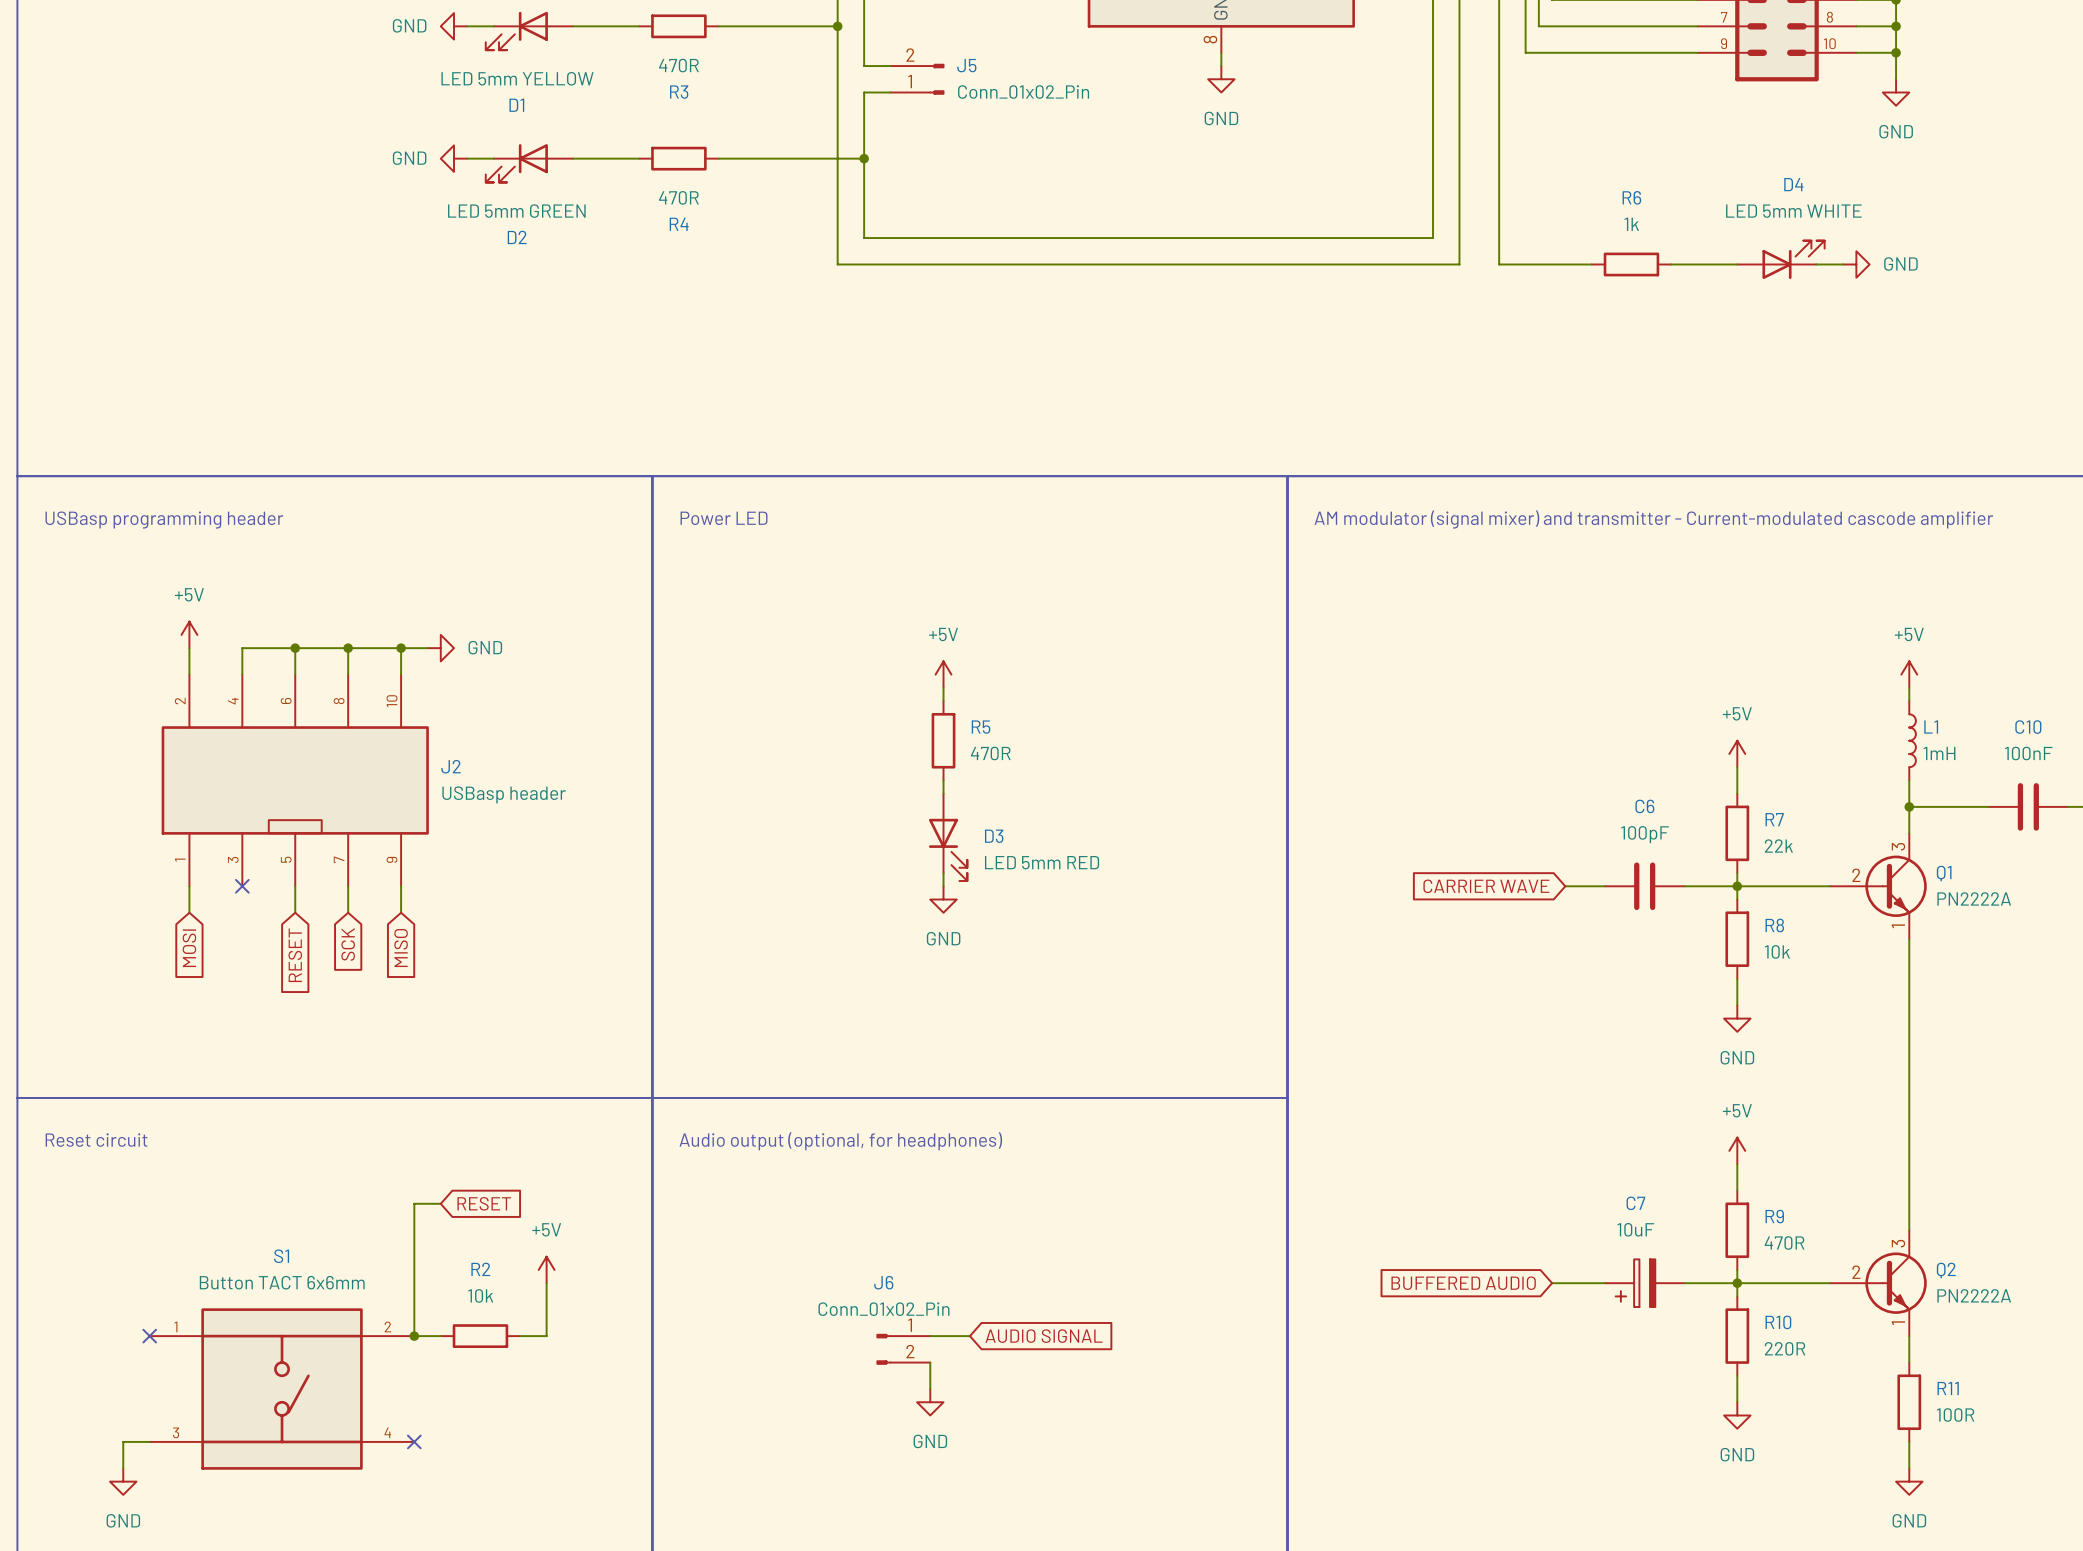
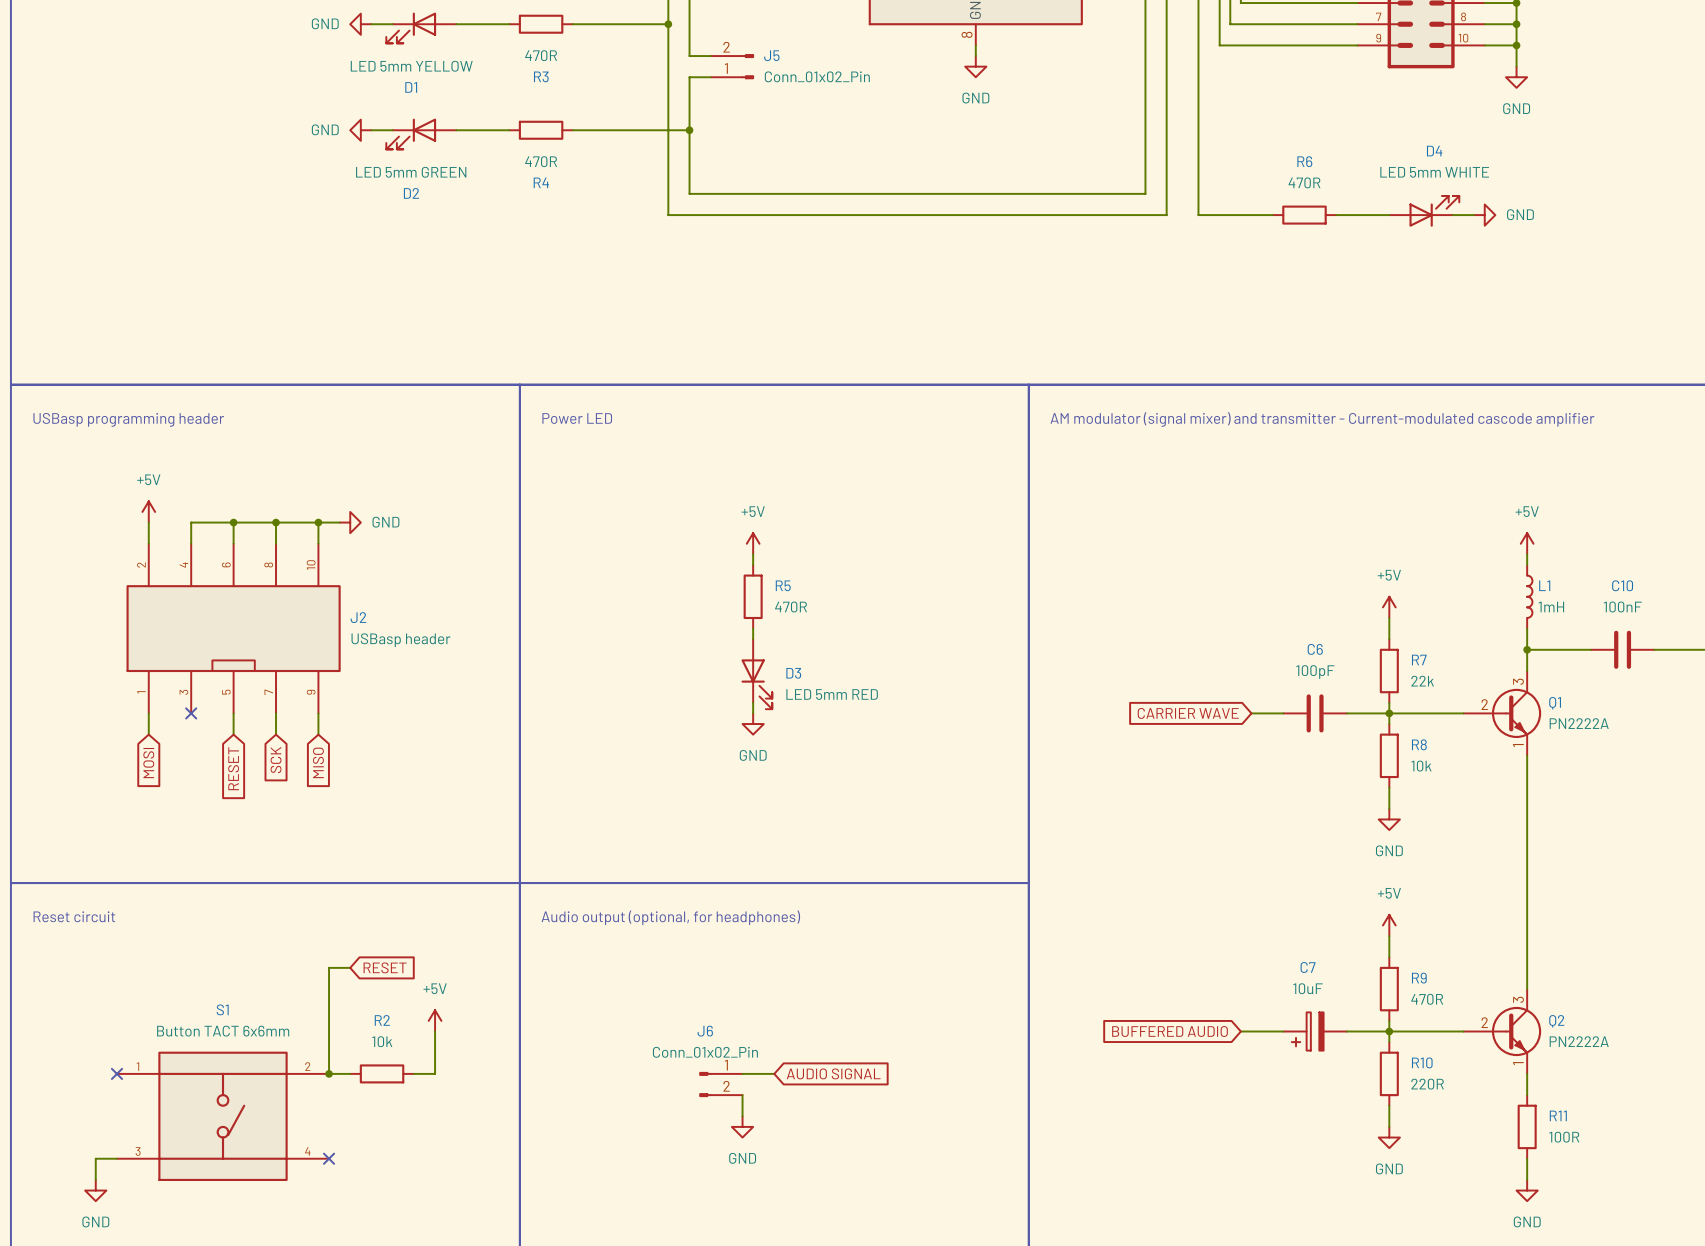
R6 value: 1k (1631, 224) -> 470R (1304, 182)

